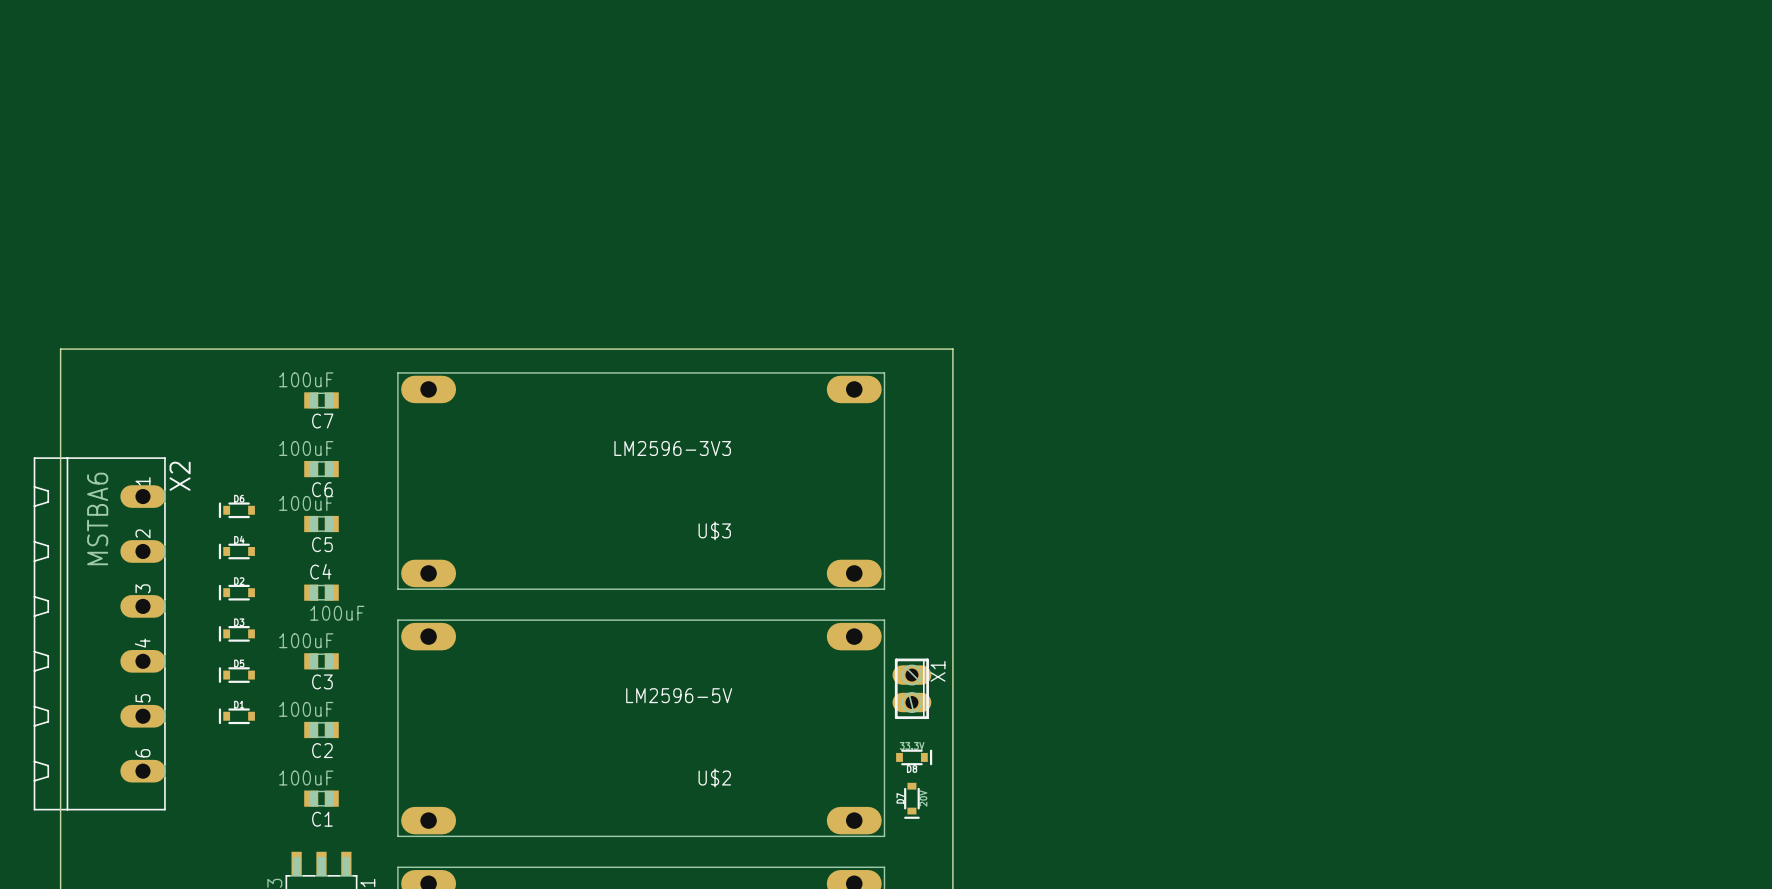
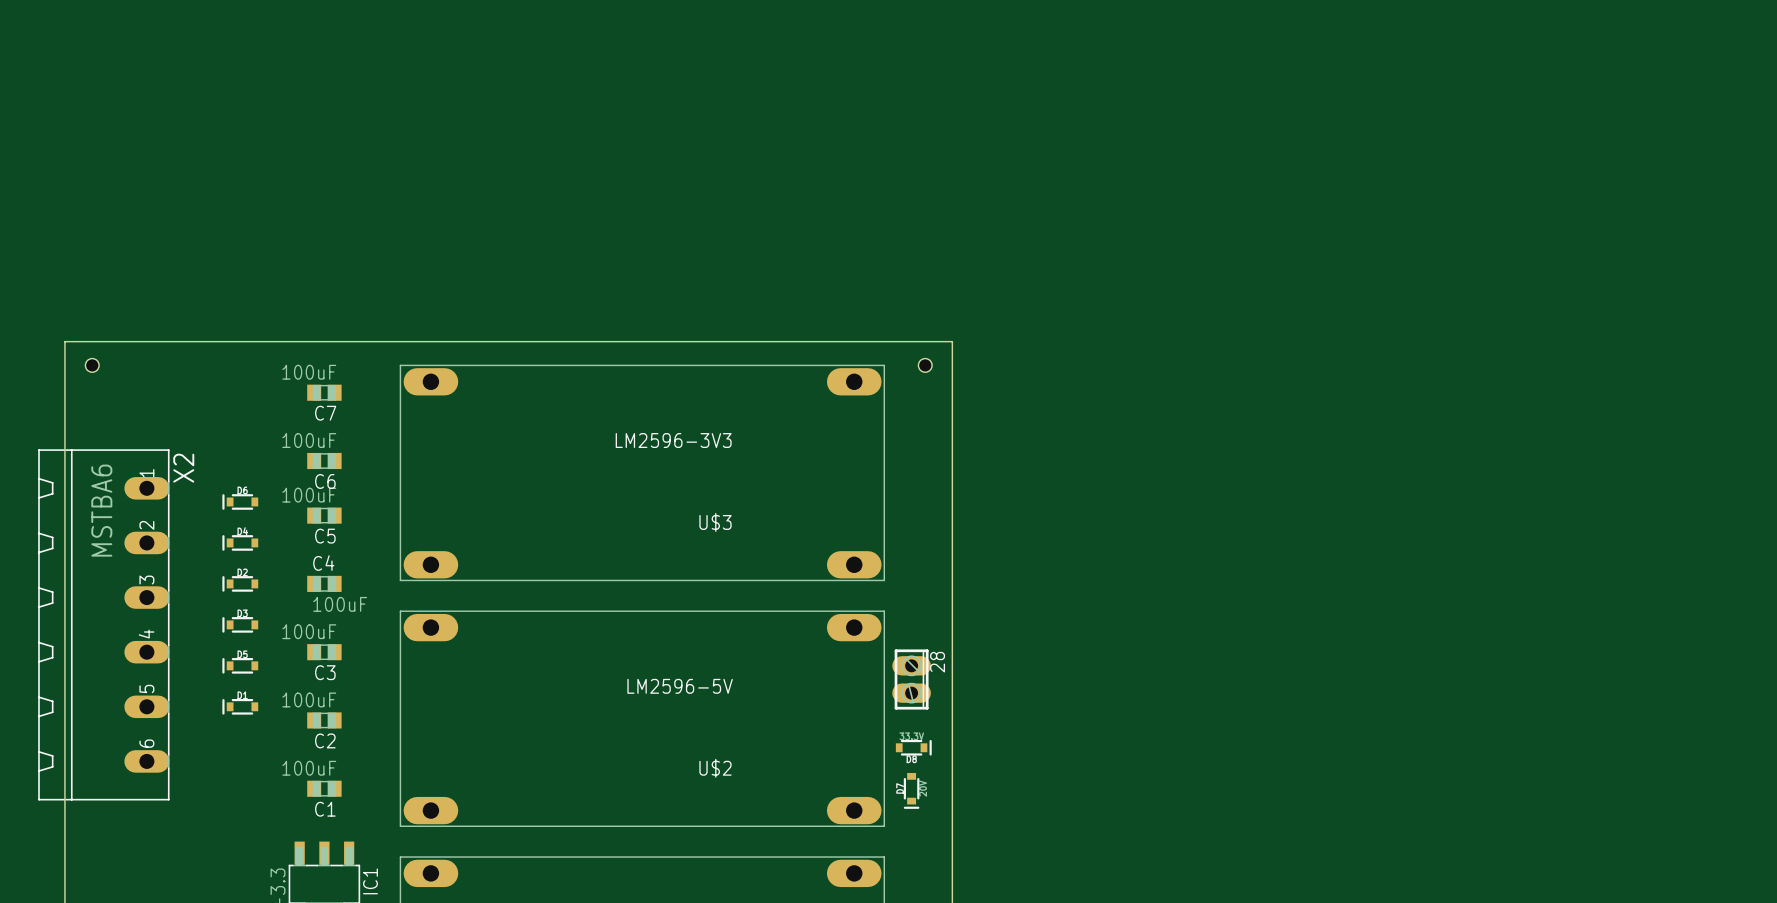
hole: none -> (92, 365)
hole: none -> (925, 365)
X1 name: X1 (938, 671) -> 28 (937, 662)

